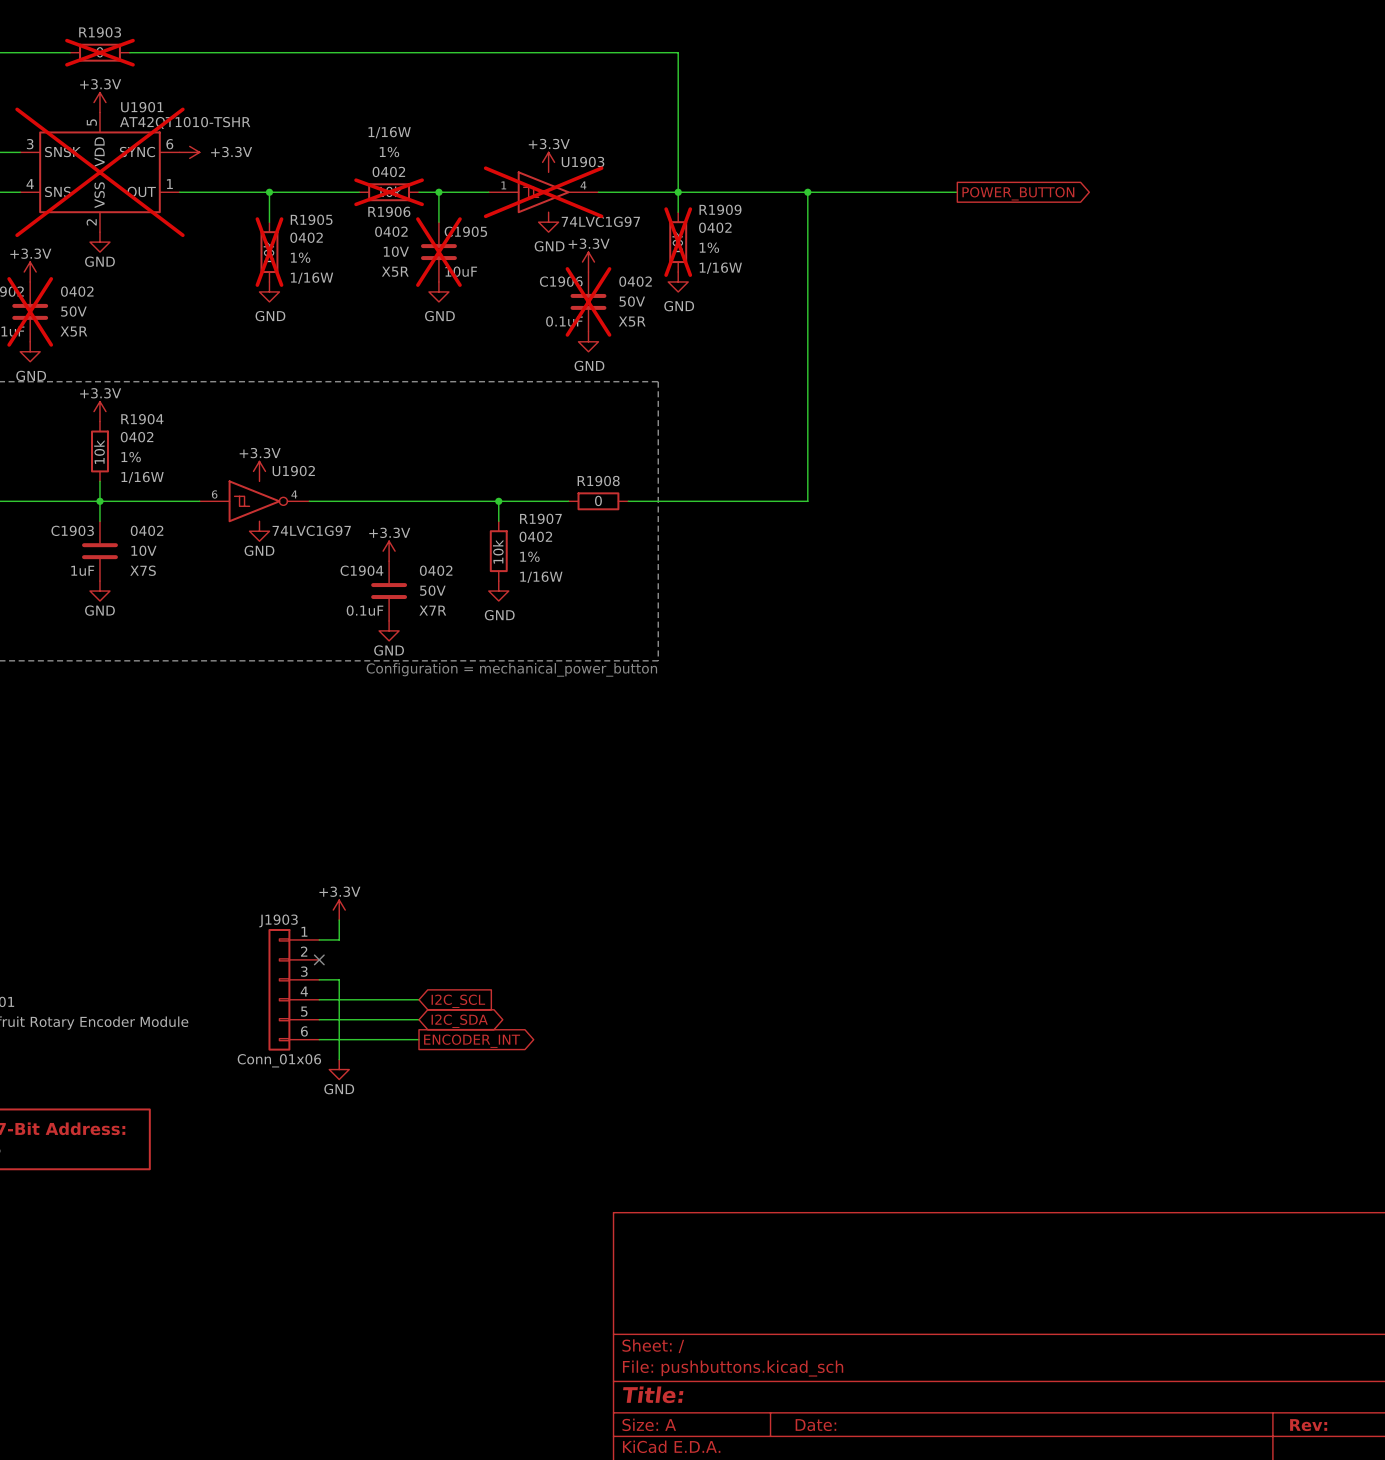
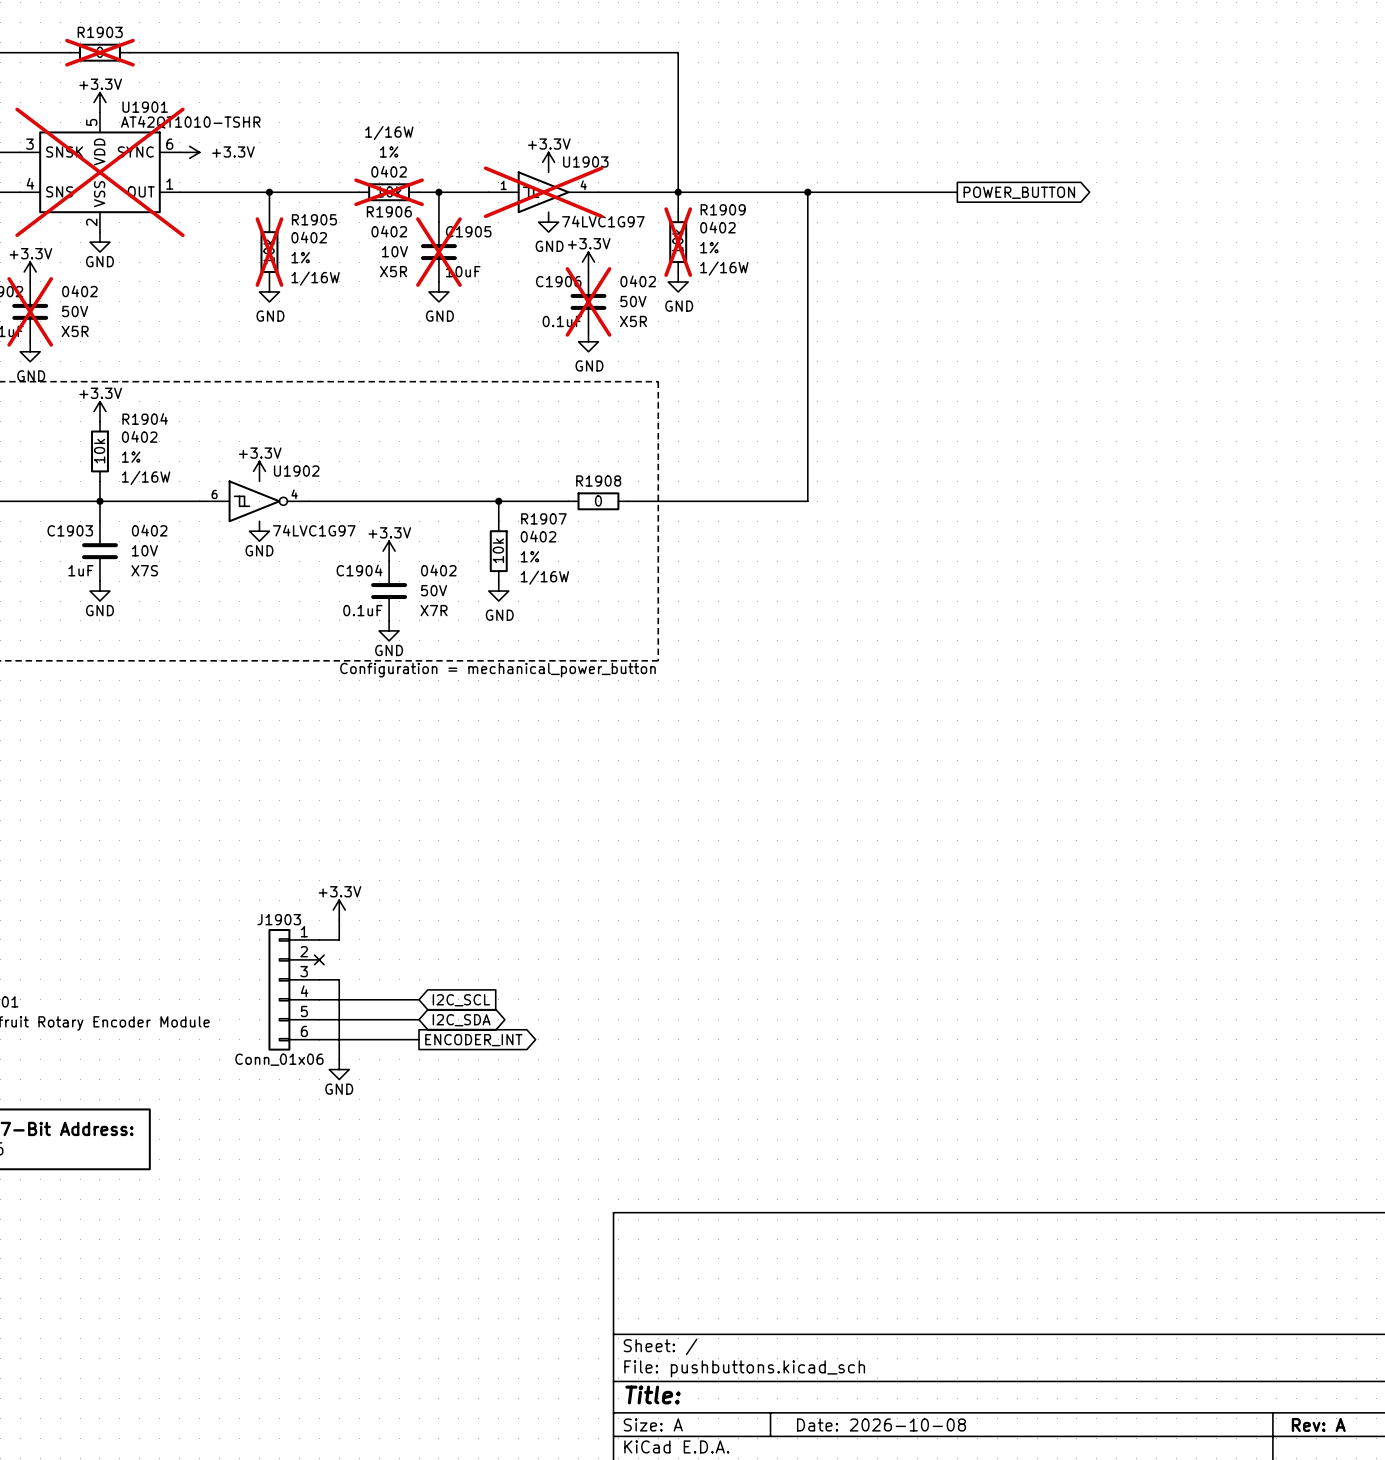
title block: Date: (815, 1425) -> Date: 2026-10-08 (881, 1424)
title block: Rev: (1308, 1425) -> Rev: A (1318, 1424)

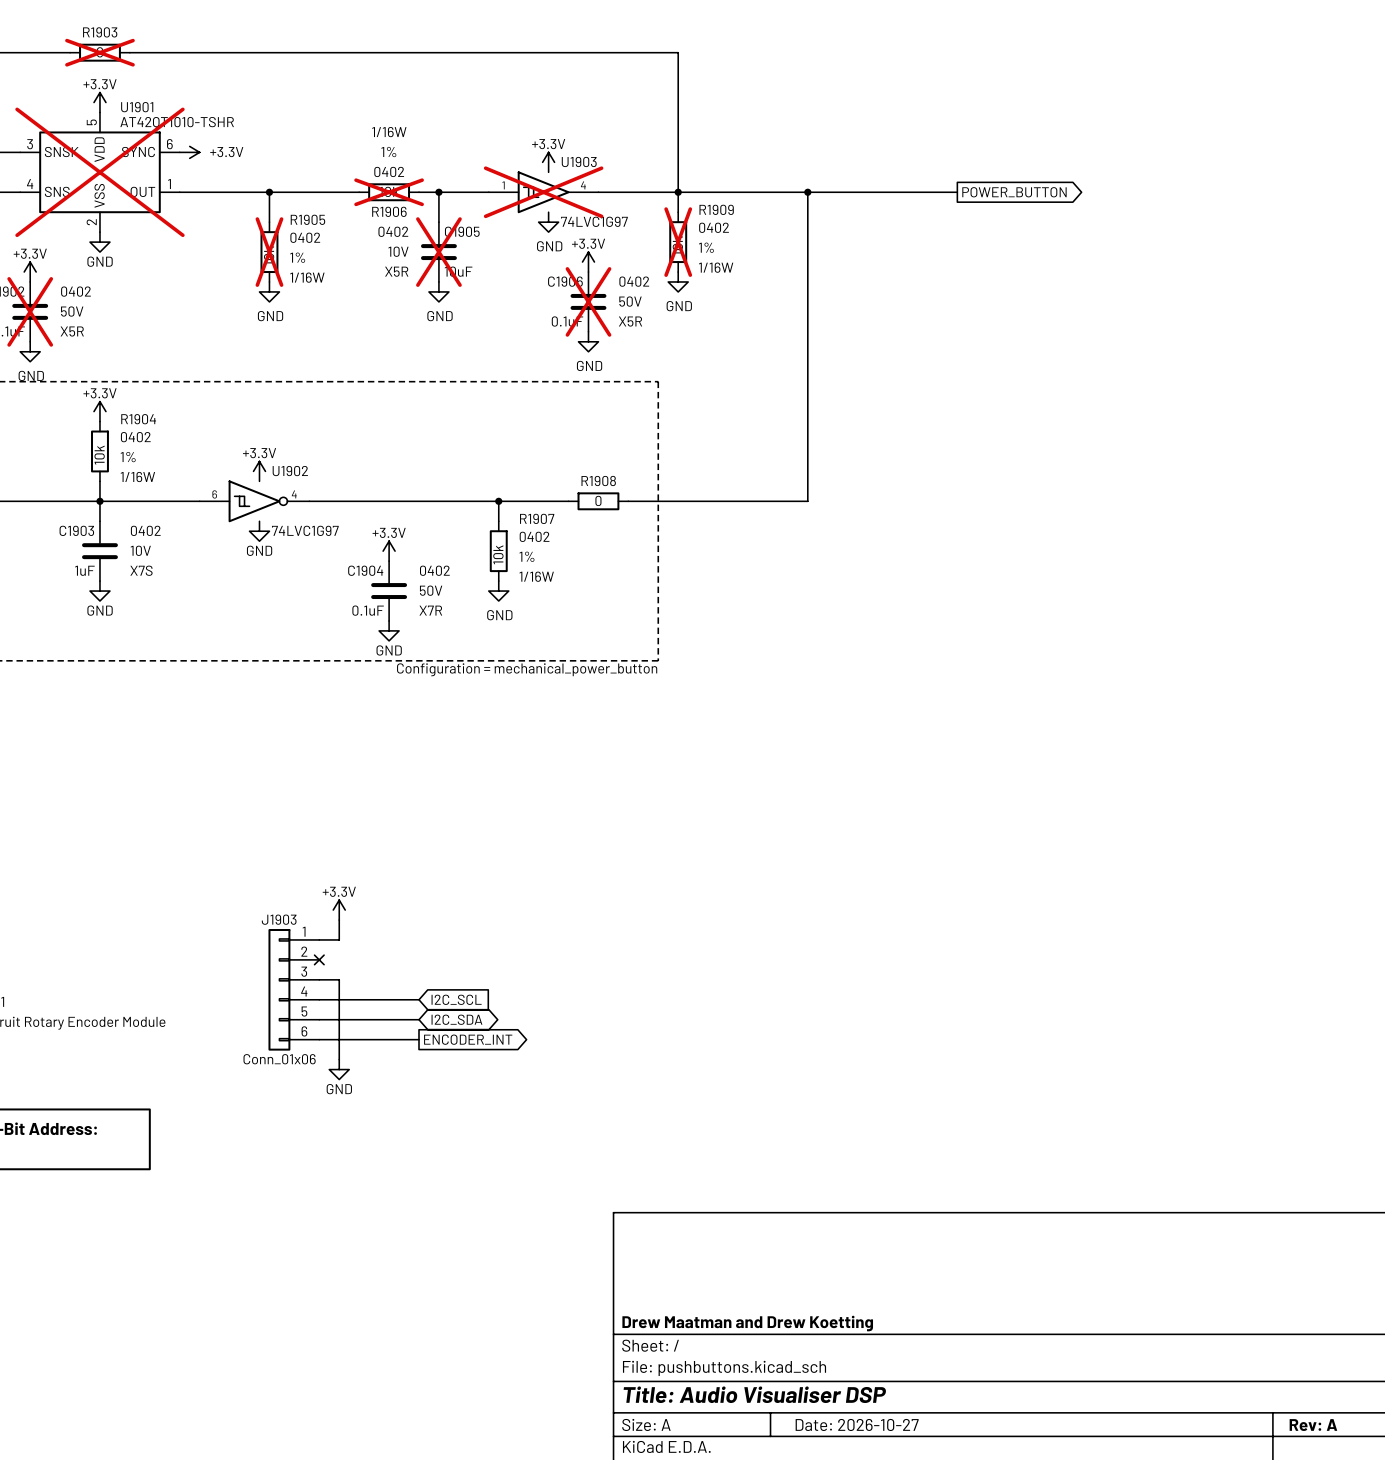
title block: none -> Drew Maatman and Drew Koetting (747, 1323)
title block: Title: (653, 1394) -> Title: Audio Visualiser DSP (754, 1394)
title block: Date: 2026-10-08 (881, 1424) -> Date: 2026-10-27 (857, 1424)

